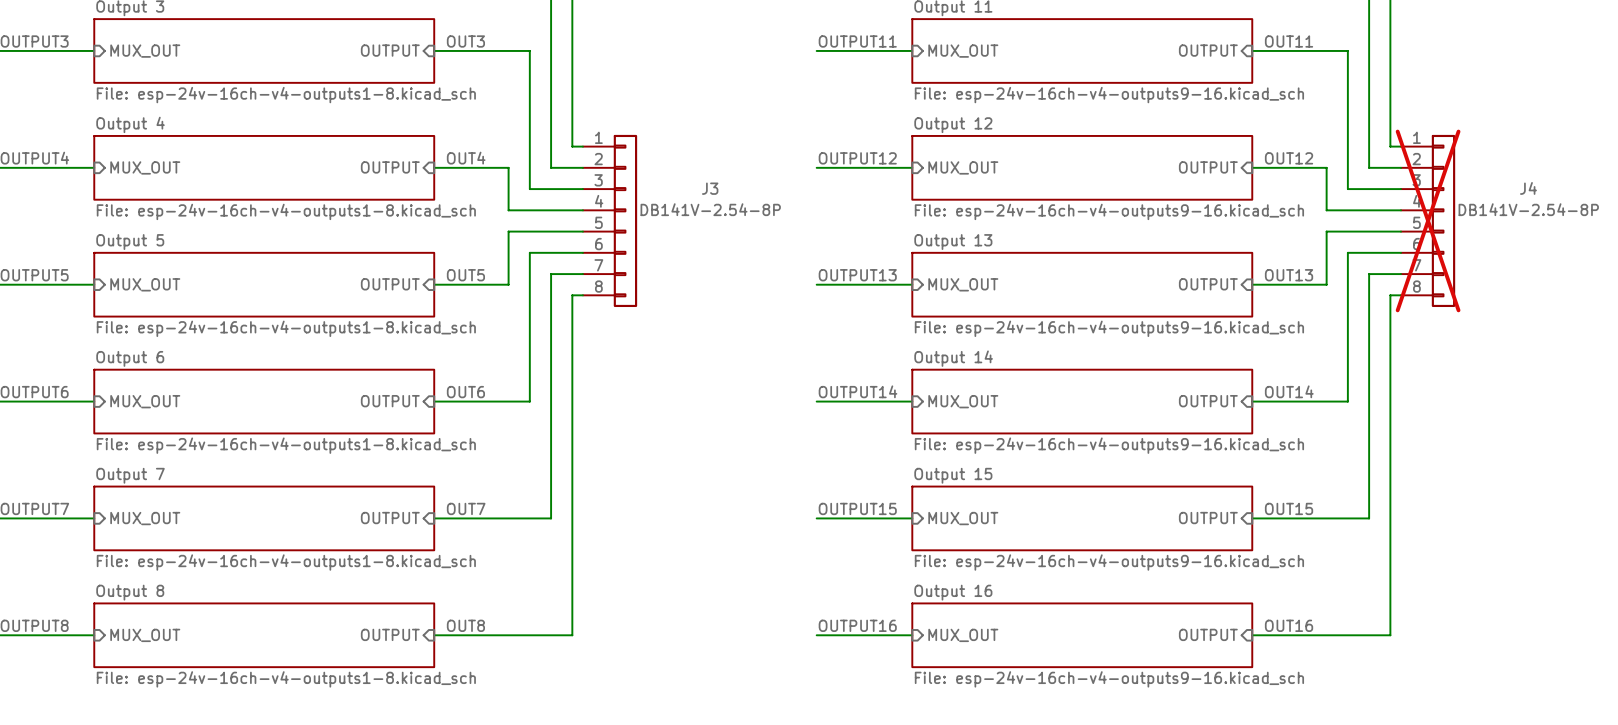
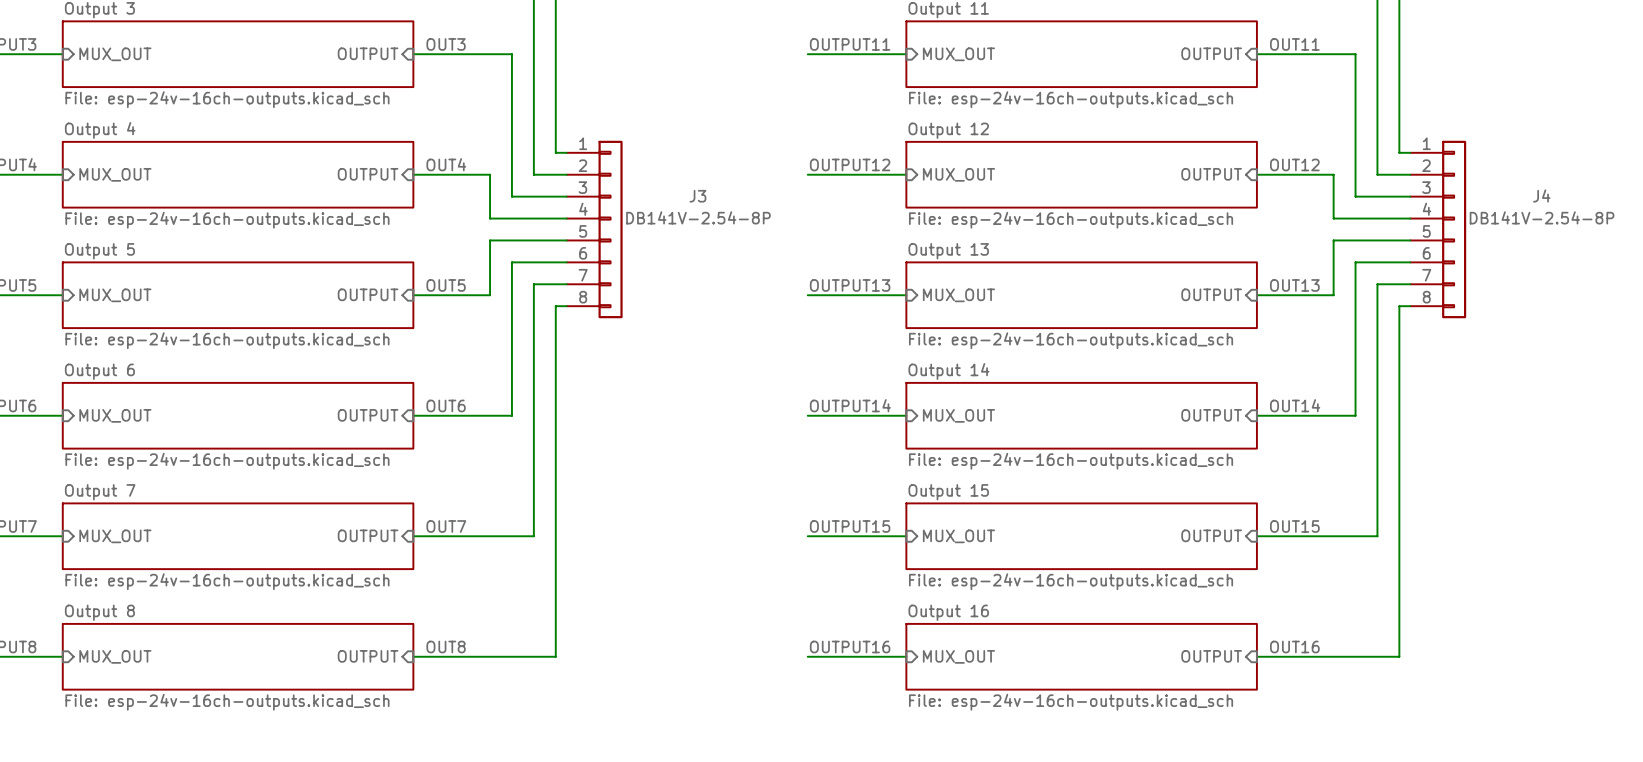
sheet Output 3 value: File: esp-24v-16ch-v4-outputs1-8.kicad_sch (286, 95) -> File: esp-24v-16ch-outputs.kicad_sch (227, 99)
sheet Output 11 value: File: esp-24v-16ch-v4-outputs9-16.kicad_sch (1109, 95) -> File: esp-24v-16ch-outputs.kicad_sch (1071, 99)
sheet Output 4 value: File: esp-24v-16ch-v4-outputs1-8.kicad_sch (286, 211) -> File: esp-24v-16ch-outputs.kicad_sch (227, 220)
sheet Output 12 value: File: esp-24v-16ch-v4-outputs9-16.kicad_sch (1109, 211) -> File: esp-24v-16ch-outputs.kicad_sch (1071, 220)
J4 do-not-place cross: (1428, 220) -> none
sheet Output 5 value: File: esp-24v-16ch-v4-outputs1-8.kicad_sch (286, 328) -> File: esp-24v-16ch-outputs.kicad_sch (227, 340)
sheet Output 13 value: File: esp-24v-16ch-v4-outputs9-16.kicad_sch (1109, 328) -> File: esp-24v-16ch-outputs.kicad_sch (1071, 340)
sheet Output 6 value: File: esp-24v-16ch-v4-outputs1-8.kicad_sch (286, 445) -> File: esp-24v-16ch-outputs.kicad_sch (227, 461)
sheet Output 14 value: File: esp-24v-16ch-v4-outputs9-16.kicad_sch (1109, 445) -> File: esp-24v-16ch-outputs.kicad_sch (1071, 461)
sheet Output 7 value: File: esp-24v-16ch-v4-outputs1-8.kicad_sch (286, 562) -> File: esp-24v-16ch-outputs.kicad_sch (227, 581)
sheet Output 15 value: File: esp-24v-16ch-v4-outputs9-16.kicad_sch (1109, 562) -> File: esp-24v-16ch-outputs.kicad_sch (1071, 581)
sheet Output 8 value: File: esp-24v-16ch-v4-outputs1-8.kicad_sch (286, 679) -> File: esp-24v-16ch-outputs.kicad_sch (227, 702)
sheet Output 16 value: File: esp-24v-16ch-v4-outputs9-16.kicad_sch (1109, 679) -> File: esp-24v-16ch-outputs.kicad_sch (1071, 702)

